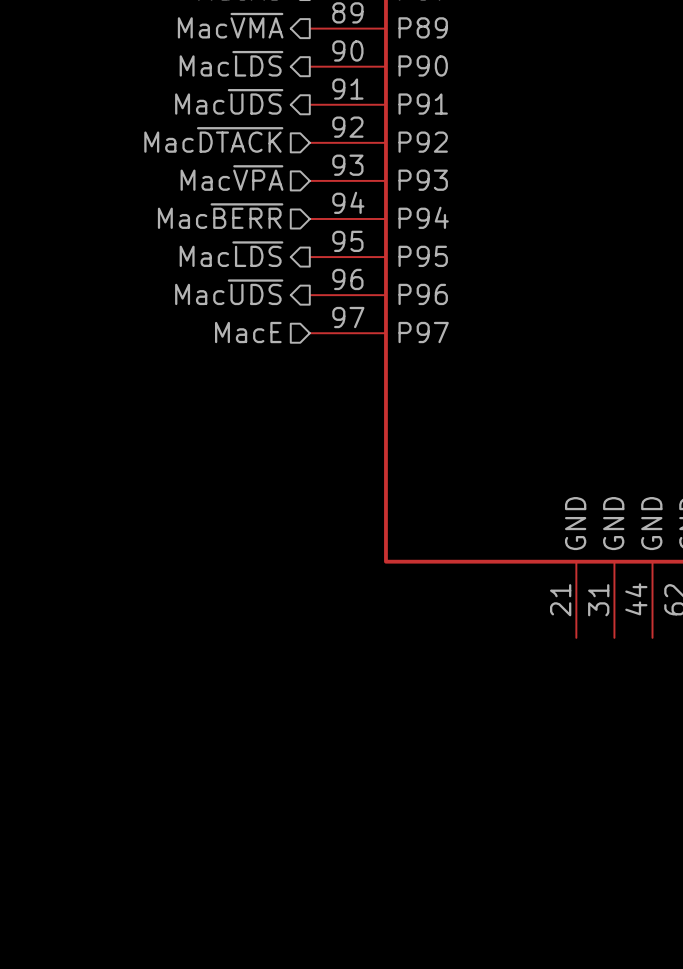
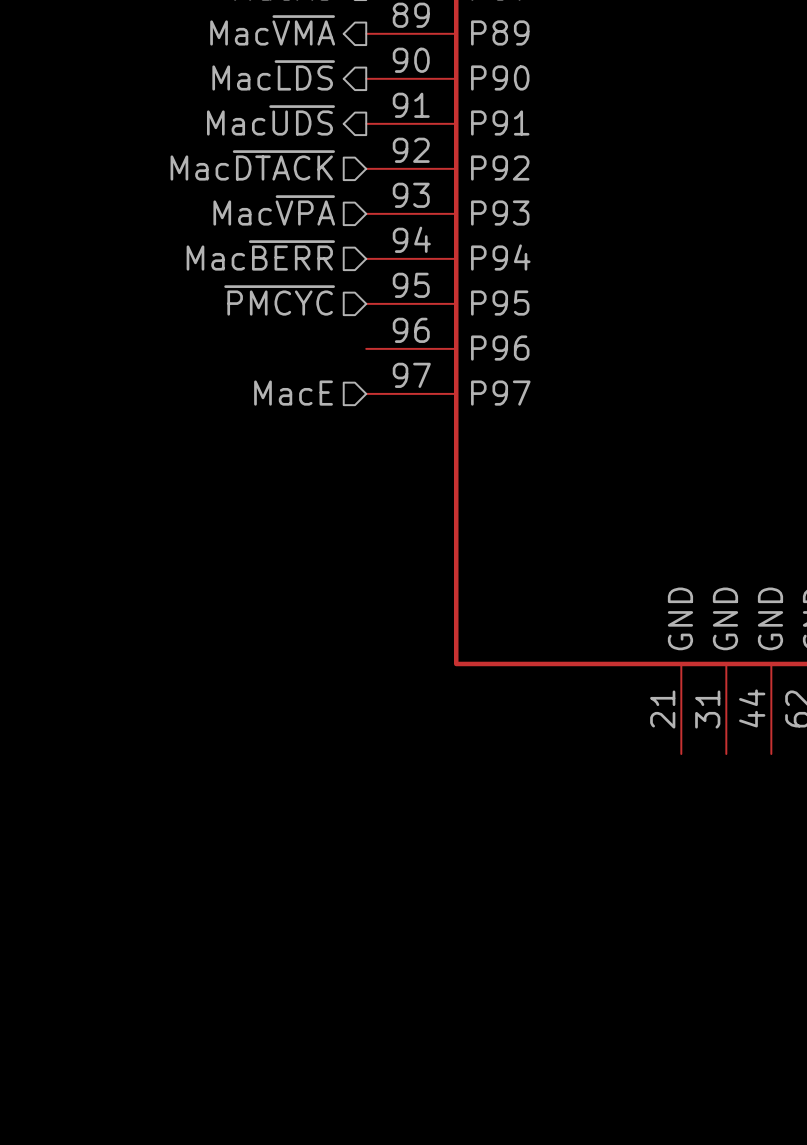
hierarchical label shape: output (231, 254) -> input (279, 300)
hierarchical label: Mac~{LDS} (231, 254) -> ~{PMCYC} (279, 300)
hierarchical label: Mac~{UDS} (229, 292) -> none

